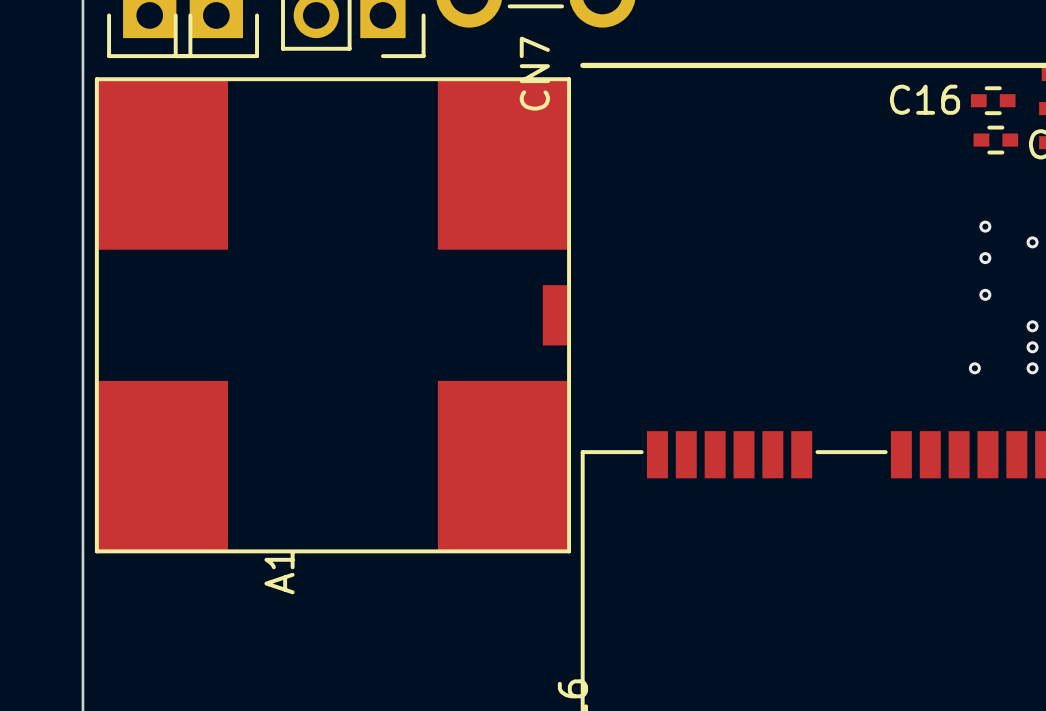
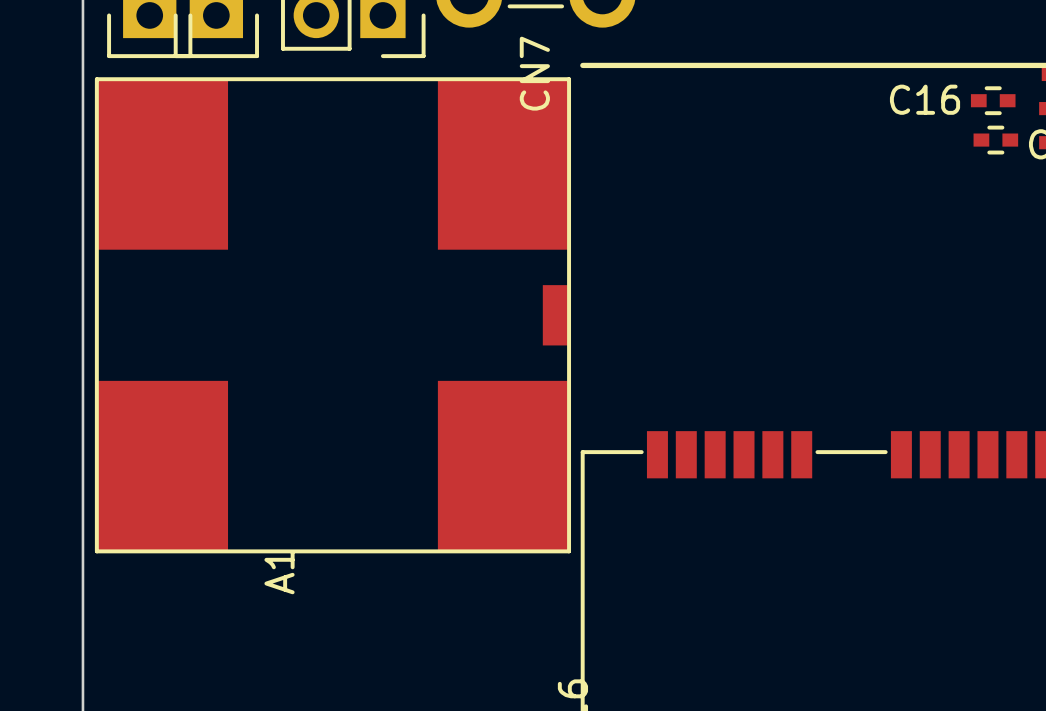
via: (985, 226) -> none
via: (1032, 242) -> none
via: (985, 258) -> none
via: (985, 294) -> none
via: (1032, 326) -> none
via: (1032, 347) -> none
via: (974, 368) -> none
via: (1032, 368) -> none

